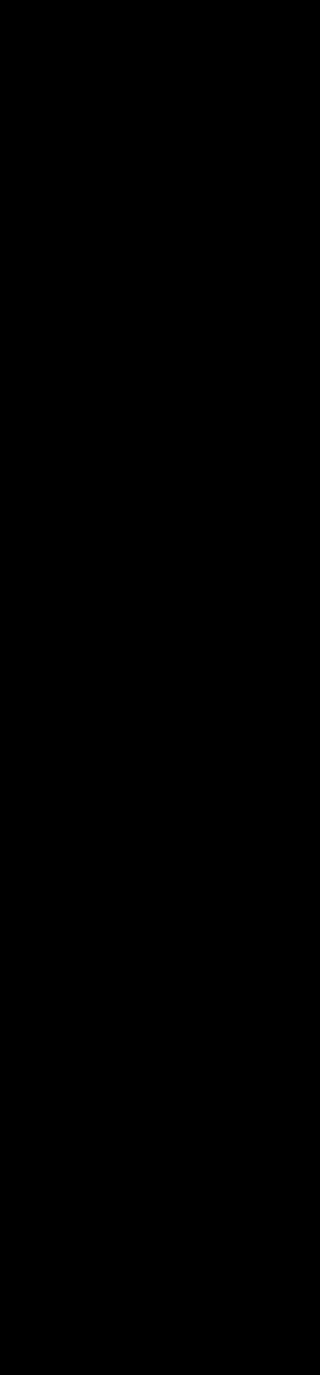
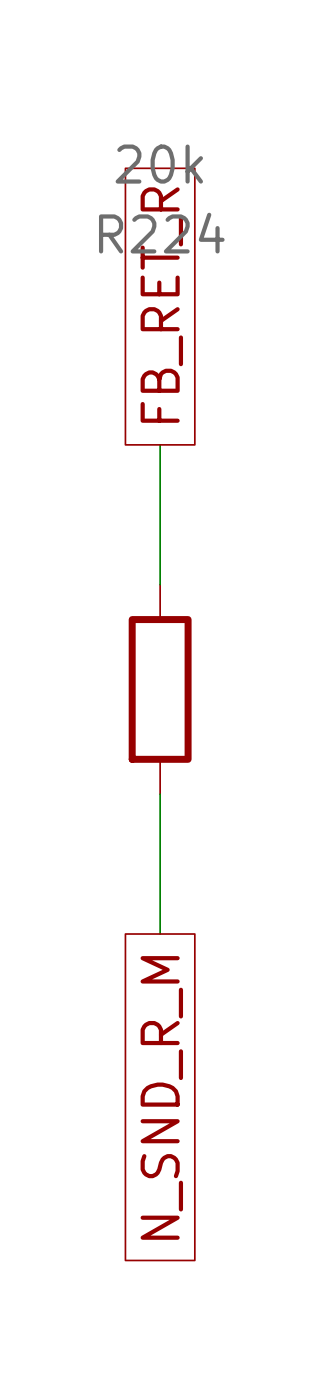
global label: none -> FB_RET_R (161, 305)
wire: none -> (160, 444) (160, 584)
R224: none -> 20k (160, 689)
wire: none -> (160, 794) (160, 934)
global label: none -> N_SND_R_M (161, 1097)

